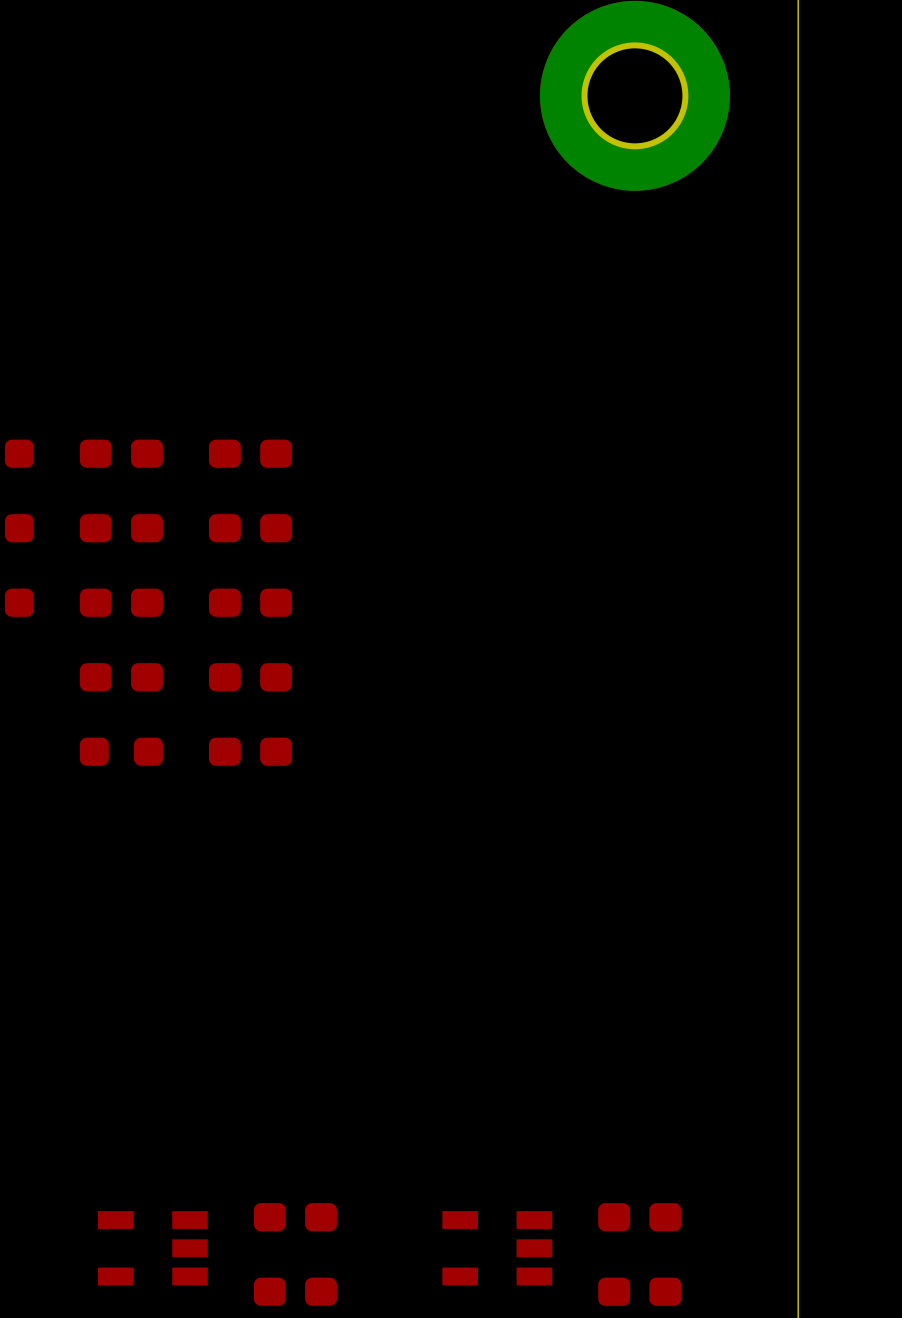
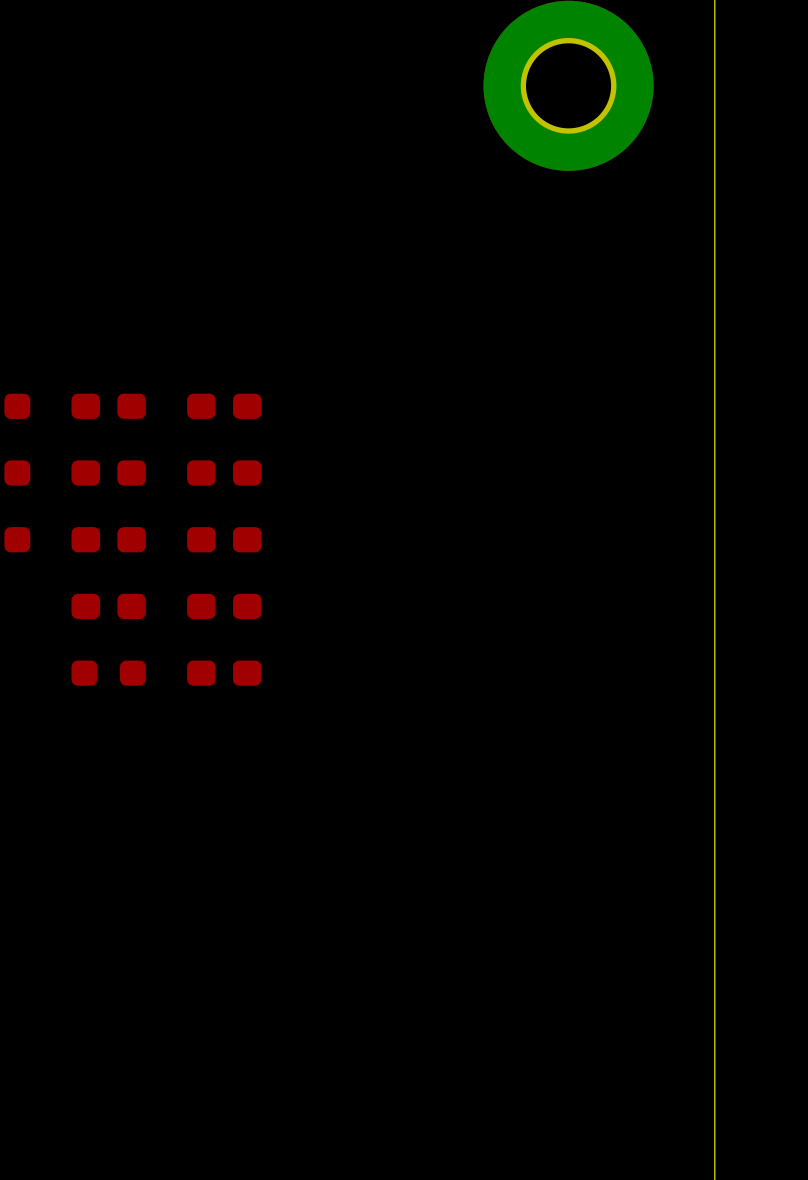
part: (295, 1217) -> none
part: (639, 1217) -> none
part: (152, 1248) -> none
part: (497, 1248) -> none
part: (295, 1291) -> none
part: (639, 1291) -> none

